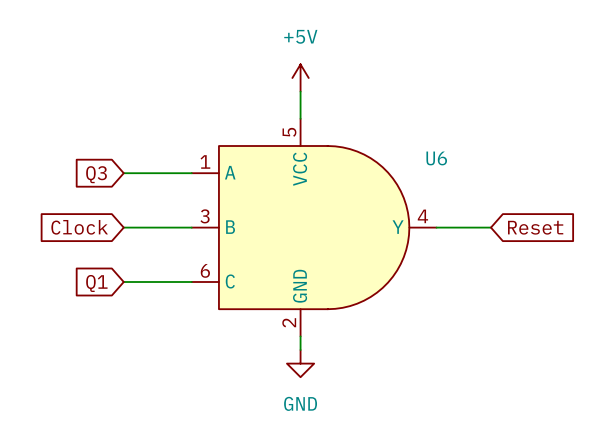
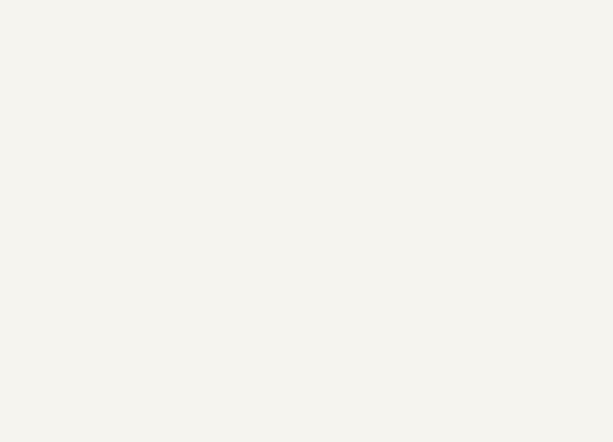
power symbol: +5V (300, 78) -> none
wire: (300, 91) (300, 118) -> none
wire: (123, 173) (191, 173) -> none
global label: Q3 (96, 174) -> none
global label: Clock (79, 227) -> none
wire: (123, 227) (191, 227) -> none
U6: (314, 227) -> none
wire: (436, 227) (490, 227) -> none
global label: Reset (535, 227) -> none
wire: (123, 282) (191, 282) -> none
global label: Q1 (96, 283) -> none
wire: (300, 336) (300, 350) -> none
power symbol: GND (300, 363) -> none

